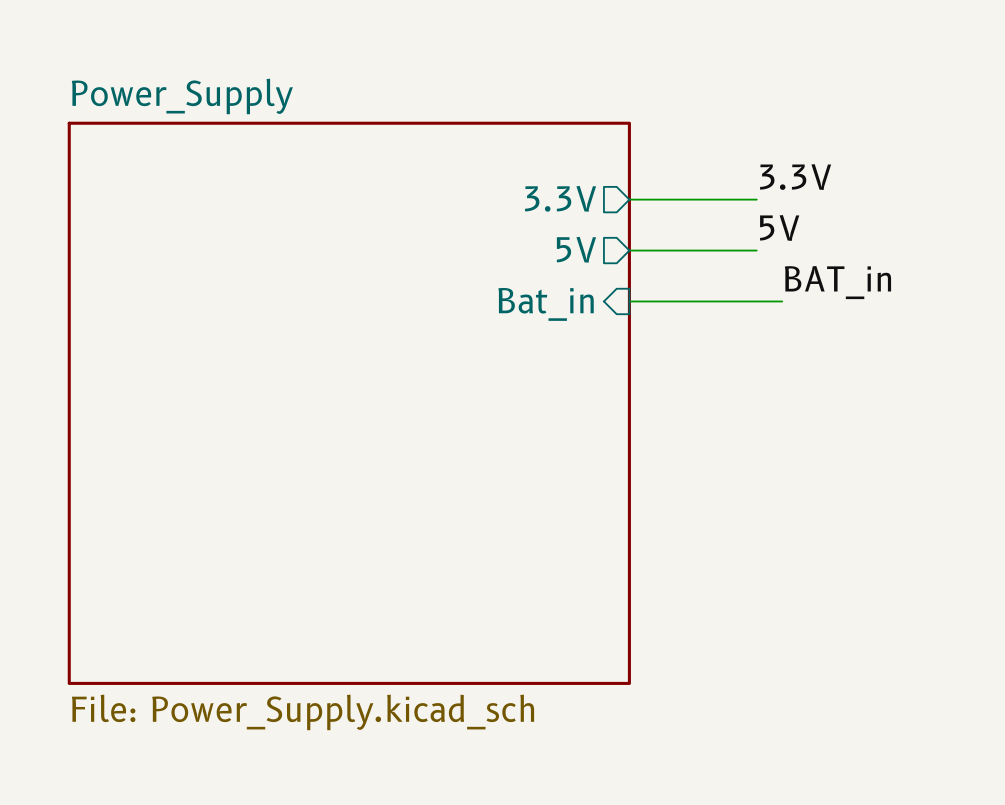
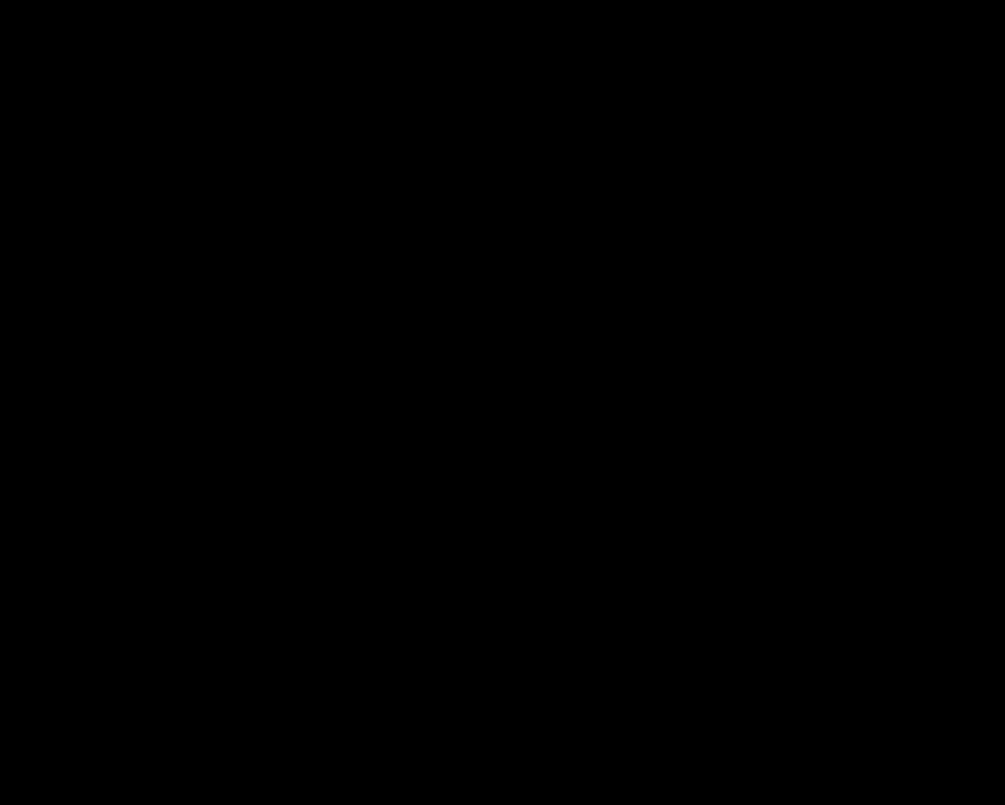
label: 3.3V (795, 177) -> none
sheet pin: 3.3V (560, 198) -> none
wire: (629, 199) (756, 199) -> none
label: 5V (779, 227) -> none
sheet pin: 5V (576, 249) -> none
wire: (629, 250) (756, 250) -> none
label: BAT_in (837, 282) -> none
wire: (629, 301) (782, 301) -> none
sheet pin: Bat_in (546, 304) -> none
sheet Power_Supply: File: Power_Supply.kicad_sch (349, 403) -> none

